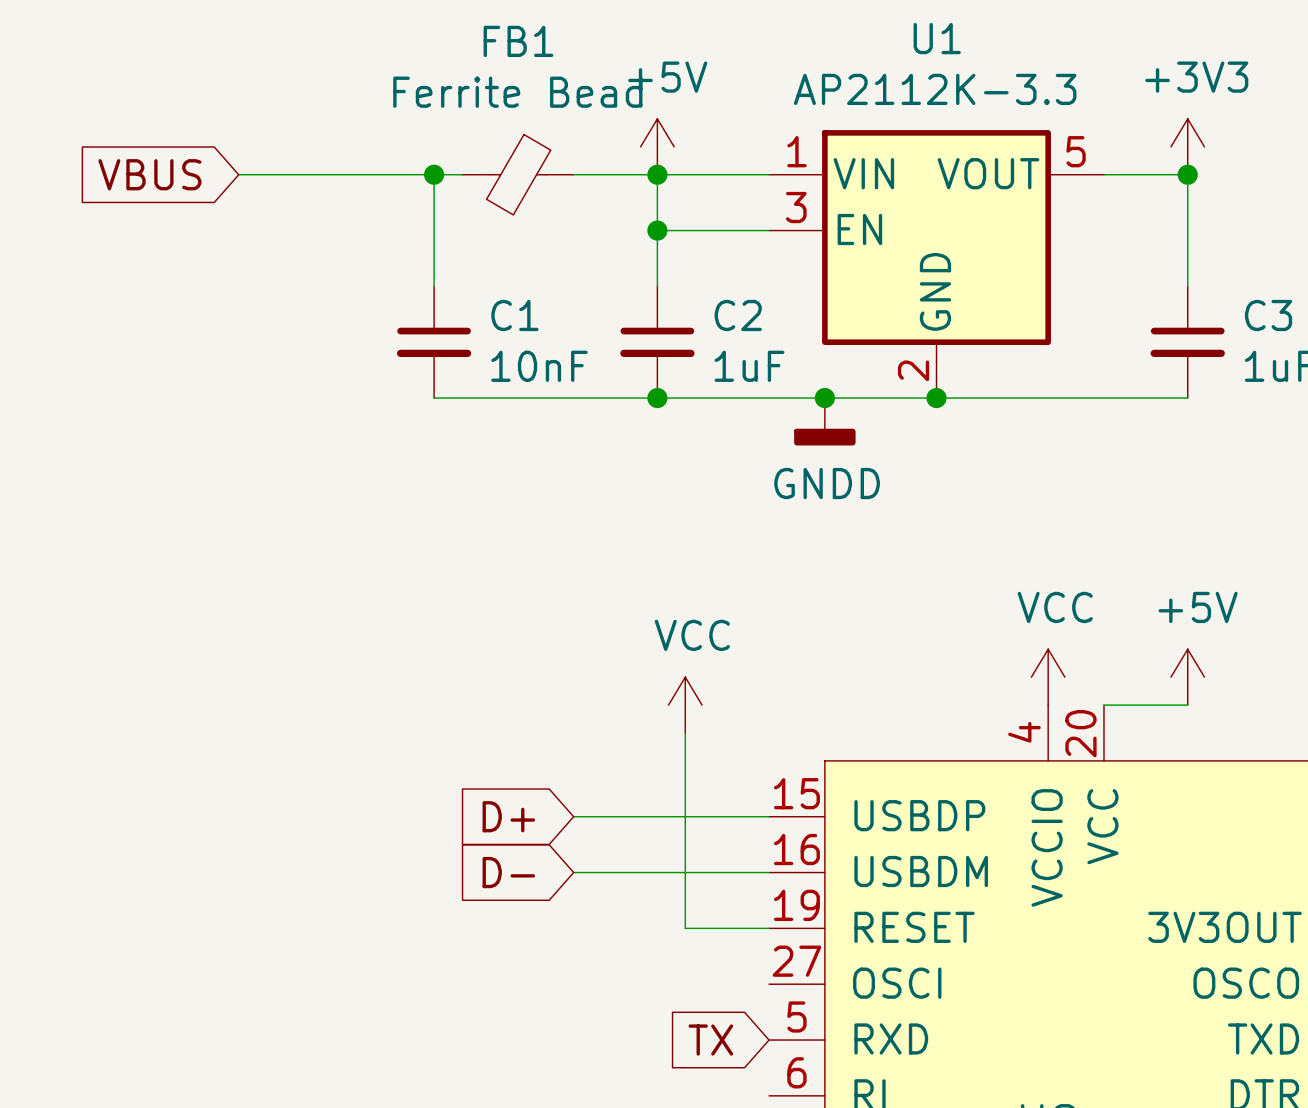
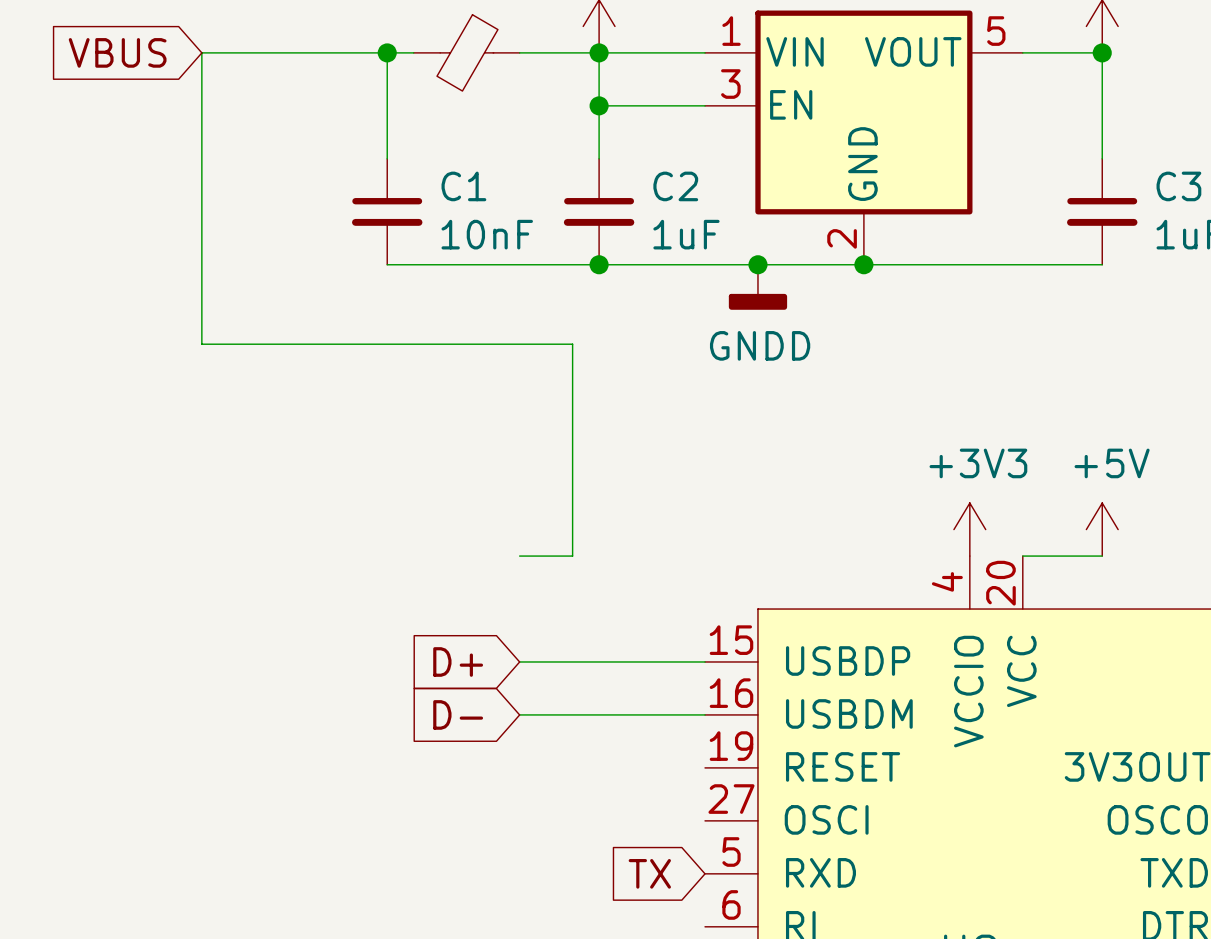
wire: none -> (201, 52) (201, 344) (572, 344) (572, 556) (519, 556)
power symbol: VCC (1048, 677) -> +3V3 (969, 529)
power symbol: VCC (685, 705) -> none
wire: (685, 732) (685, 928) (769, 928) -> none

